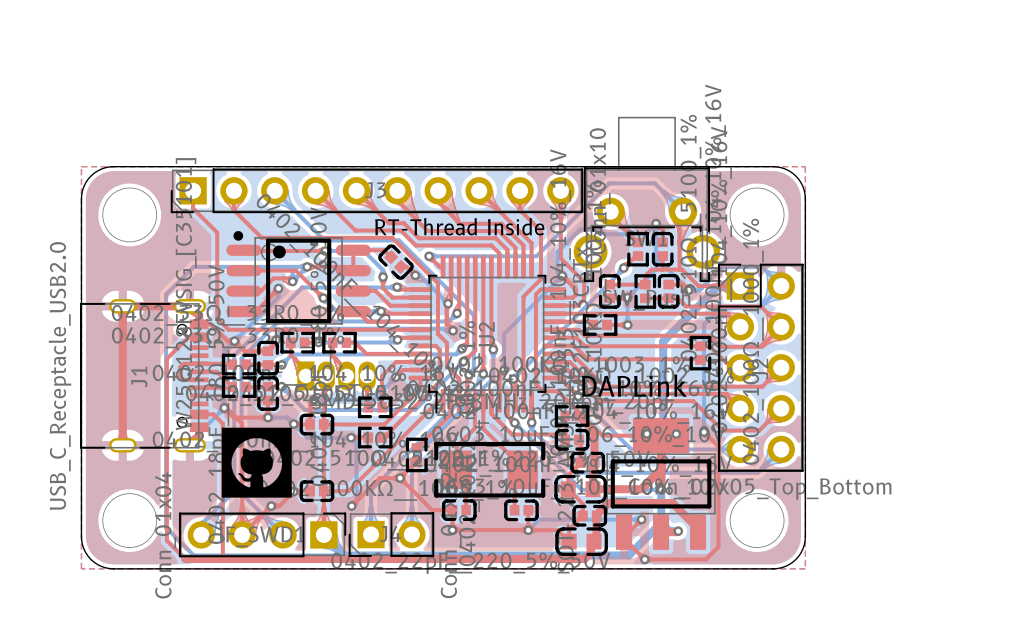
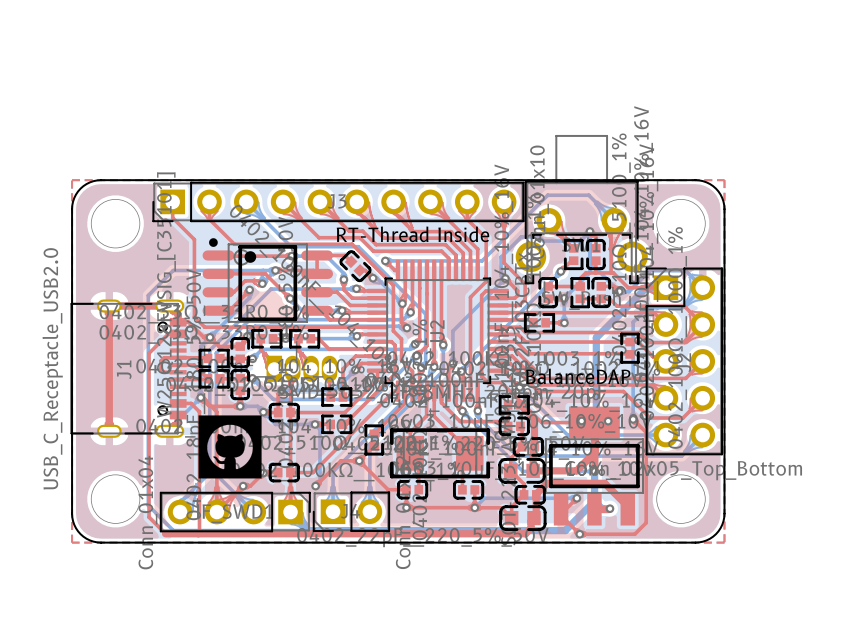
text: DAPLink (634, 385) -> BalanceDAP (578, 376)

